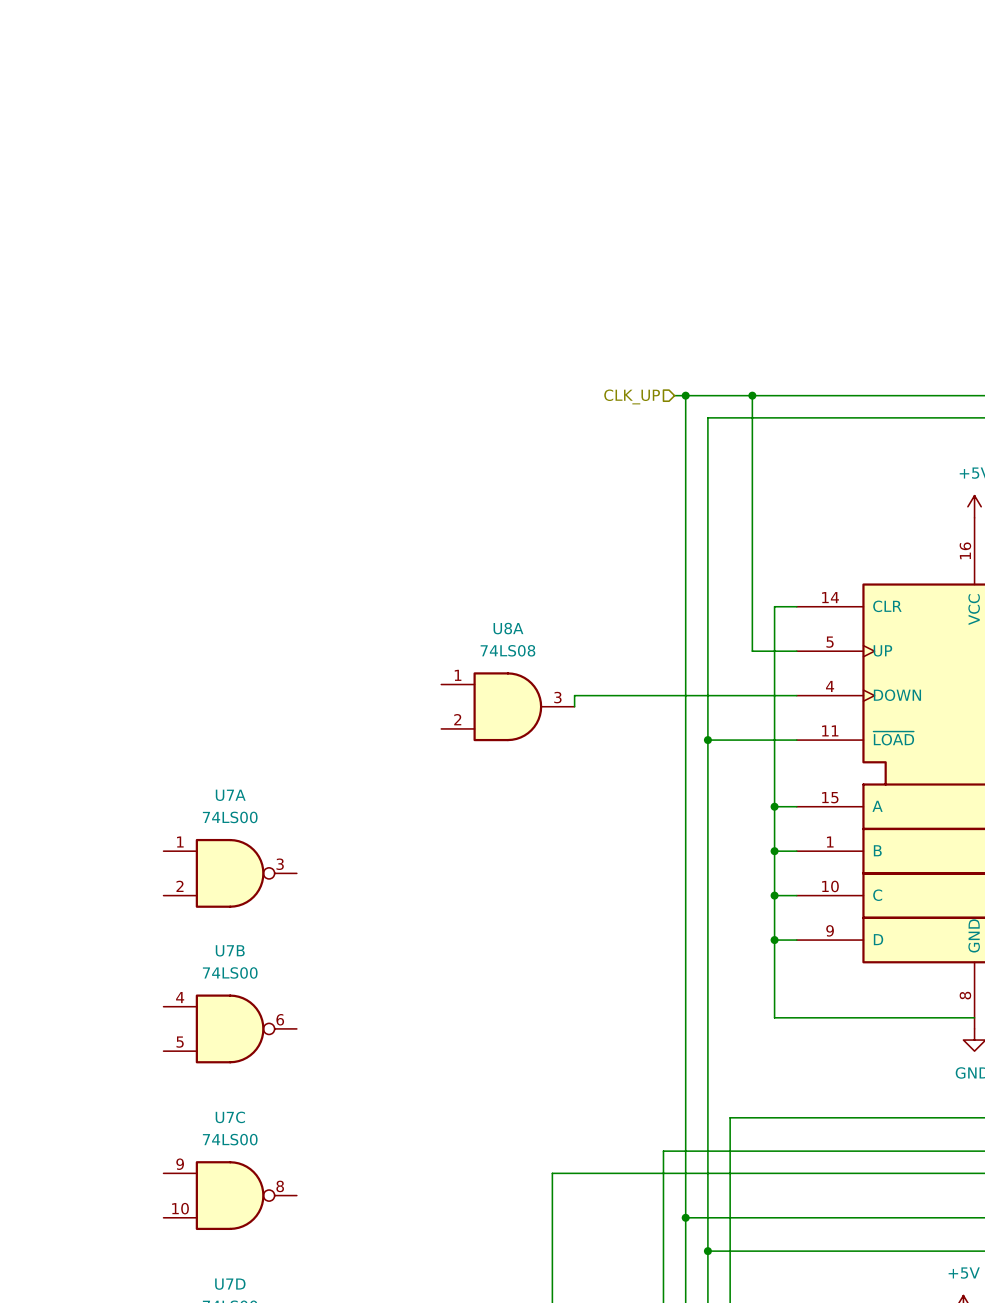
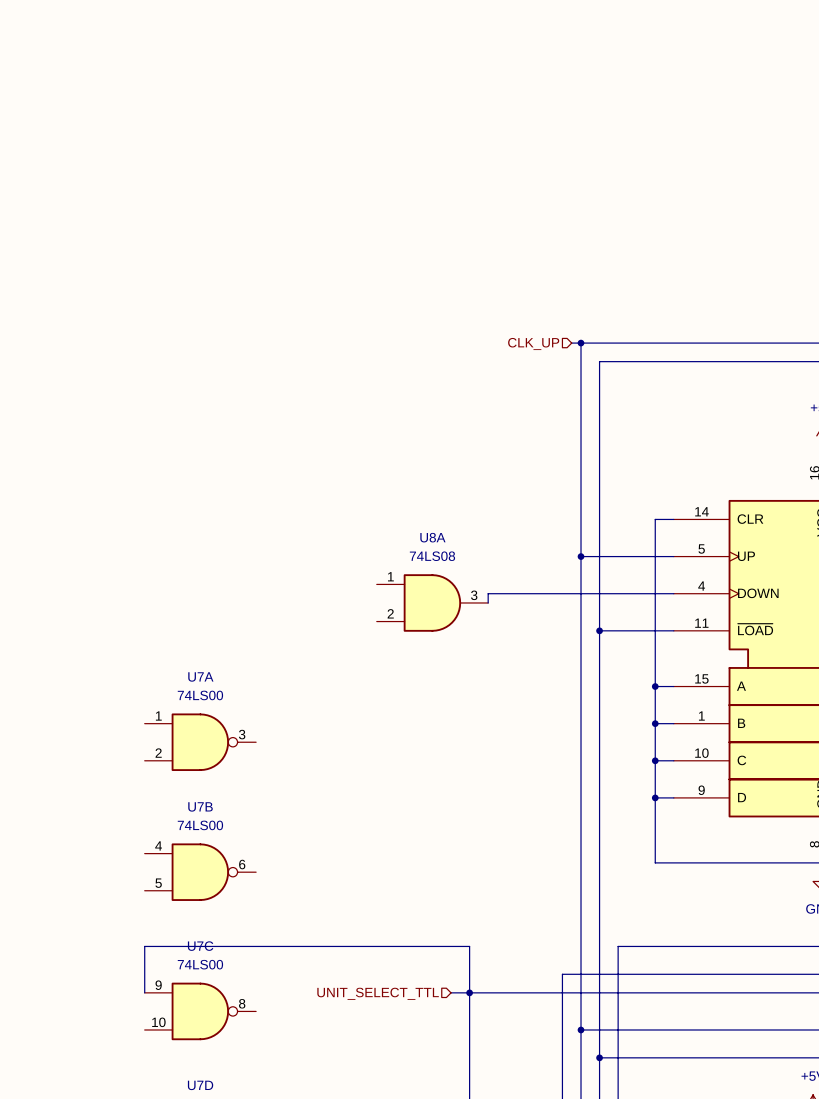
wire: (752, 395) (752, 651) -> (581, 556) (636, 556)
junction: (752, 395) -> none
junction: none -> (581, 556)
wire: none -> (144, 992) (144, 946) (469, 946) (469, 992) (451, 992)
junction: none -> (469, 992)
hierarchical label: none -> UNIT_SELECT_TTL (378, 993)

